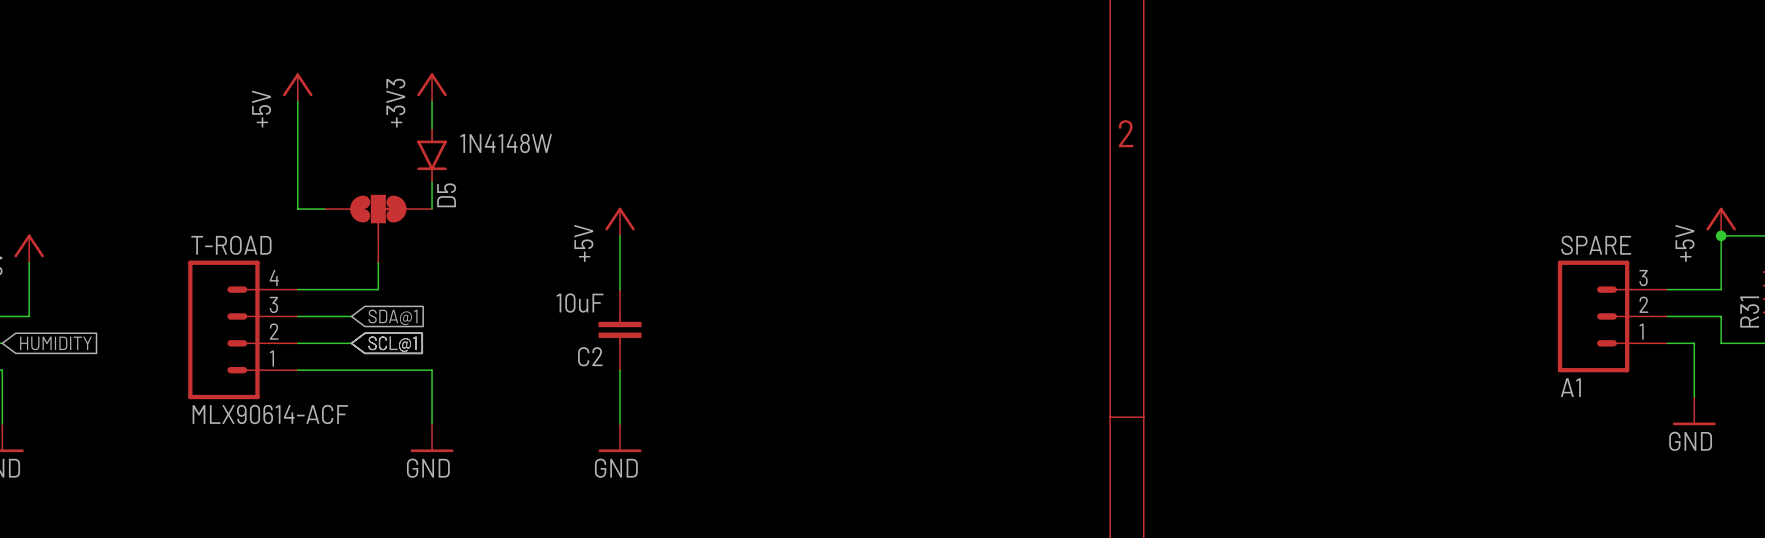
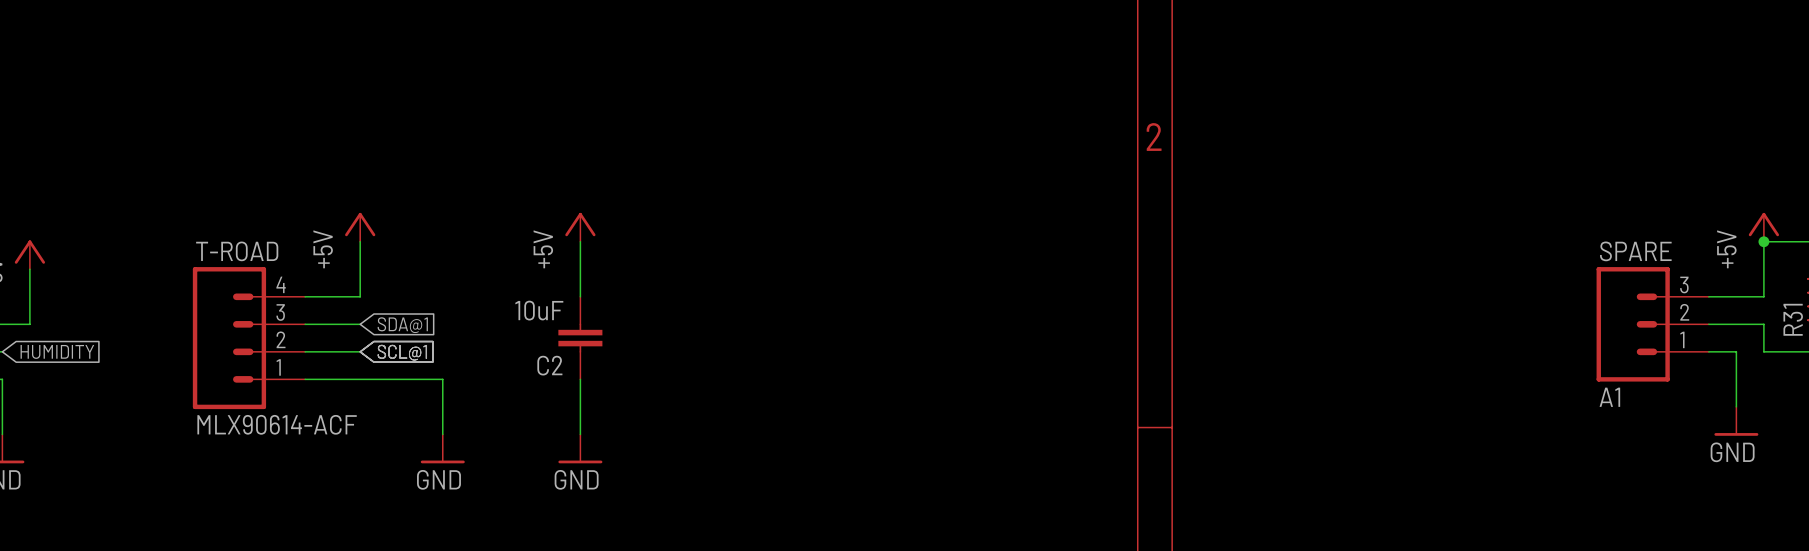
power symbol: +5V (297, 87) -> none
power symbol: +3V3 (432, 87) -> none
wire: (297, 101) (297, 209) (324, 209) -> none
wire: (432, 101) (432, 128) -> none
D5: 1N4148W (432, 155) -> none
wire: (432, 182) (432, 209) -> none
power symbol: none -> +5V (360, 227)
power symbol position: +5V (620, 221) -> +5V (580, 227)
part: (378, 228) -> none
wire: (620, 235) (620, 289) -> (580, 241) (580, 296)
wire: (378, 262) (378, 289) (351, 289) -> (360, 241) (360, 296)
C2 position: (620, 329) -> (580, 338)
wire: (620, 370) (620, 423) -> (580, 379) (580, 434)
power symbol position: GND (620, 437) -> GND (580, 448)

